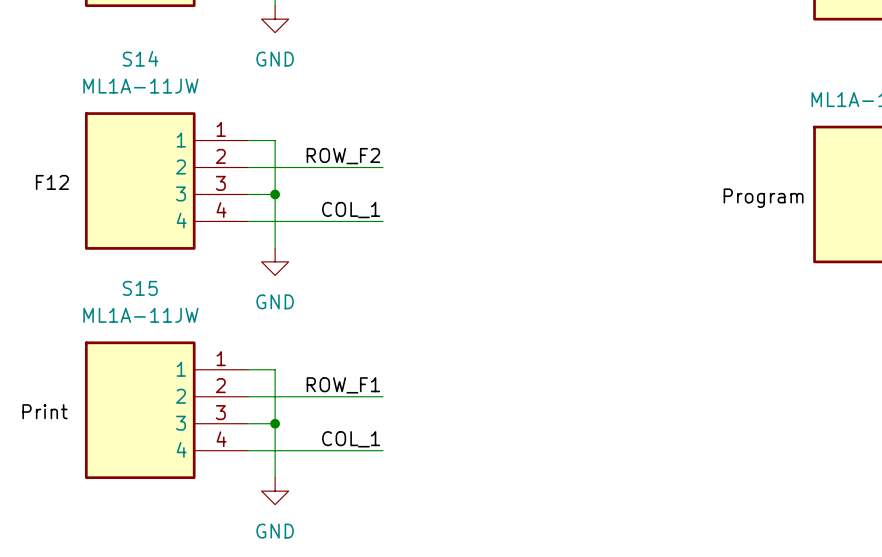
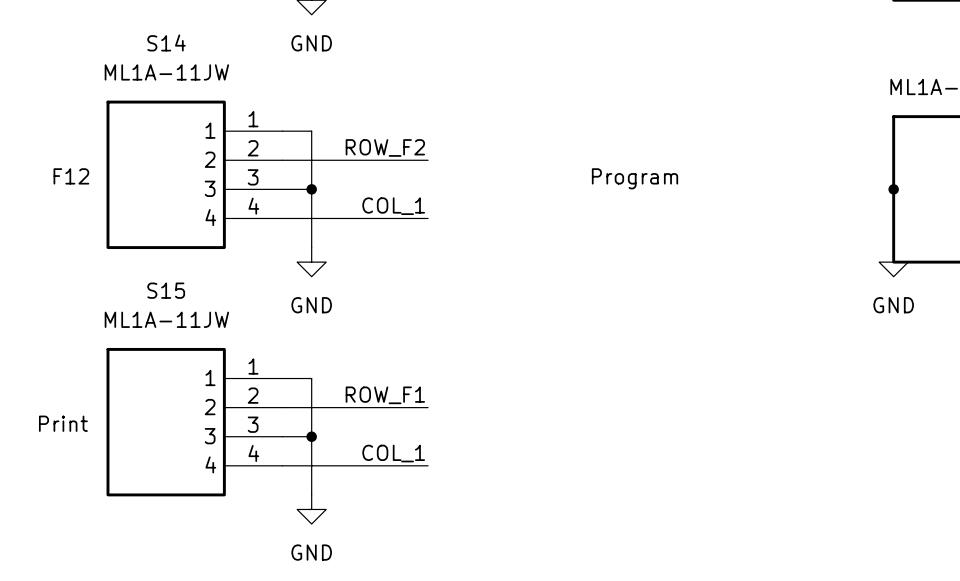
junction: none -> (893, 189)
label position: Program (763, 198) -> Program (635, 178)
power symbol: none -> GND (893, 262)

